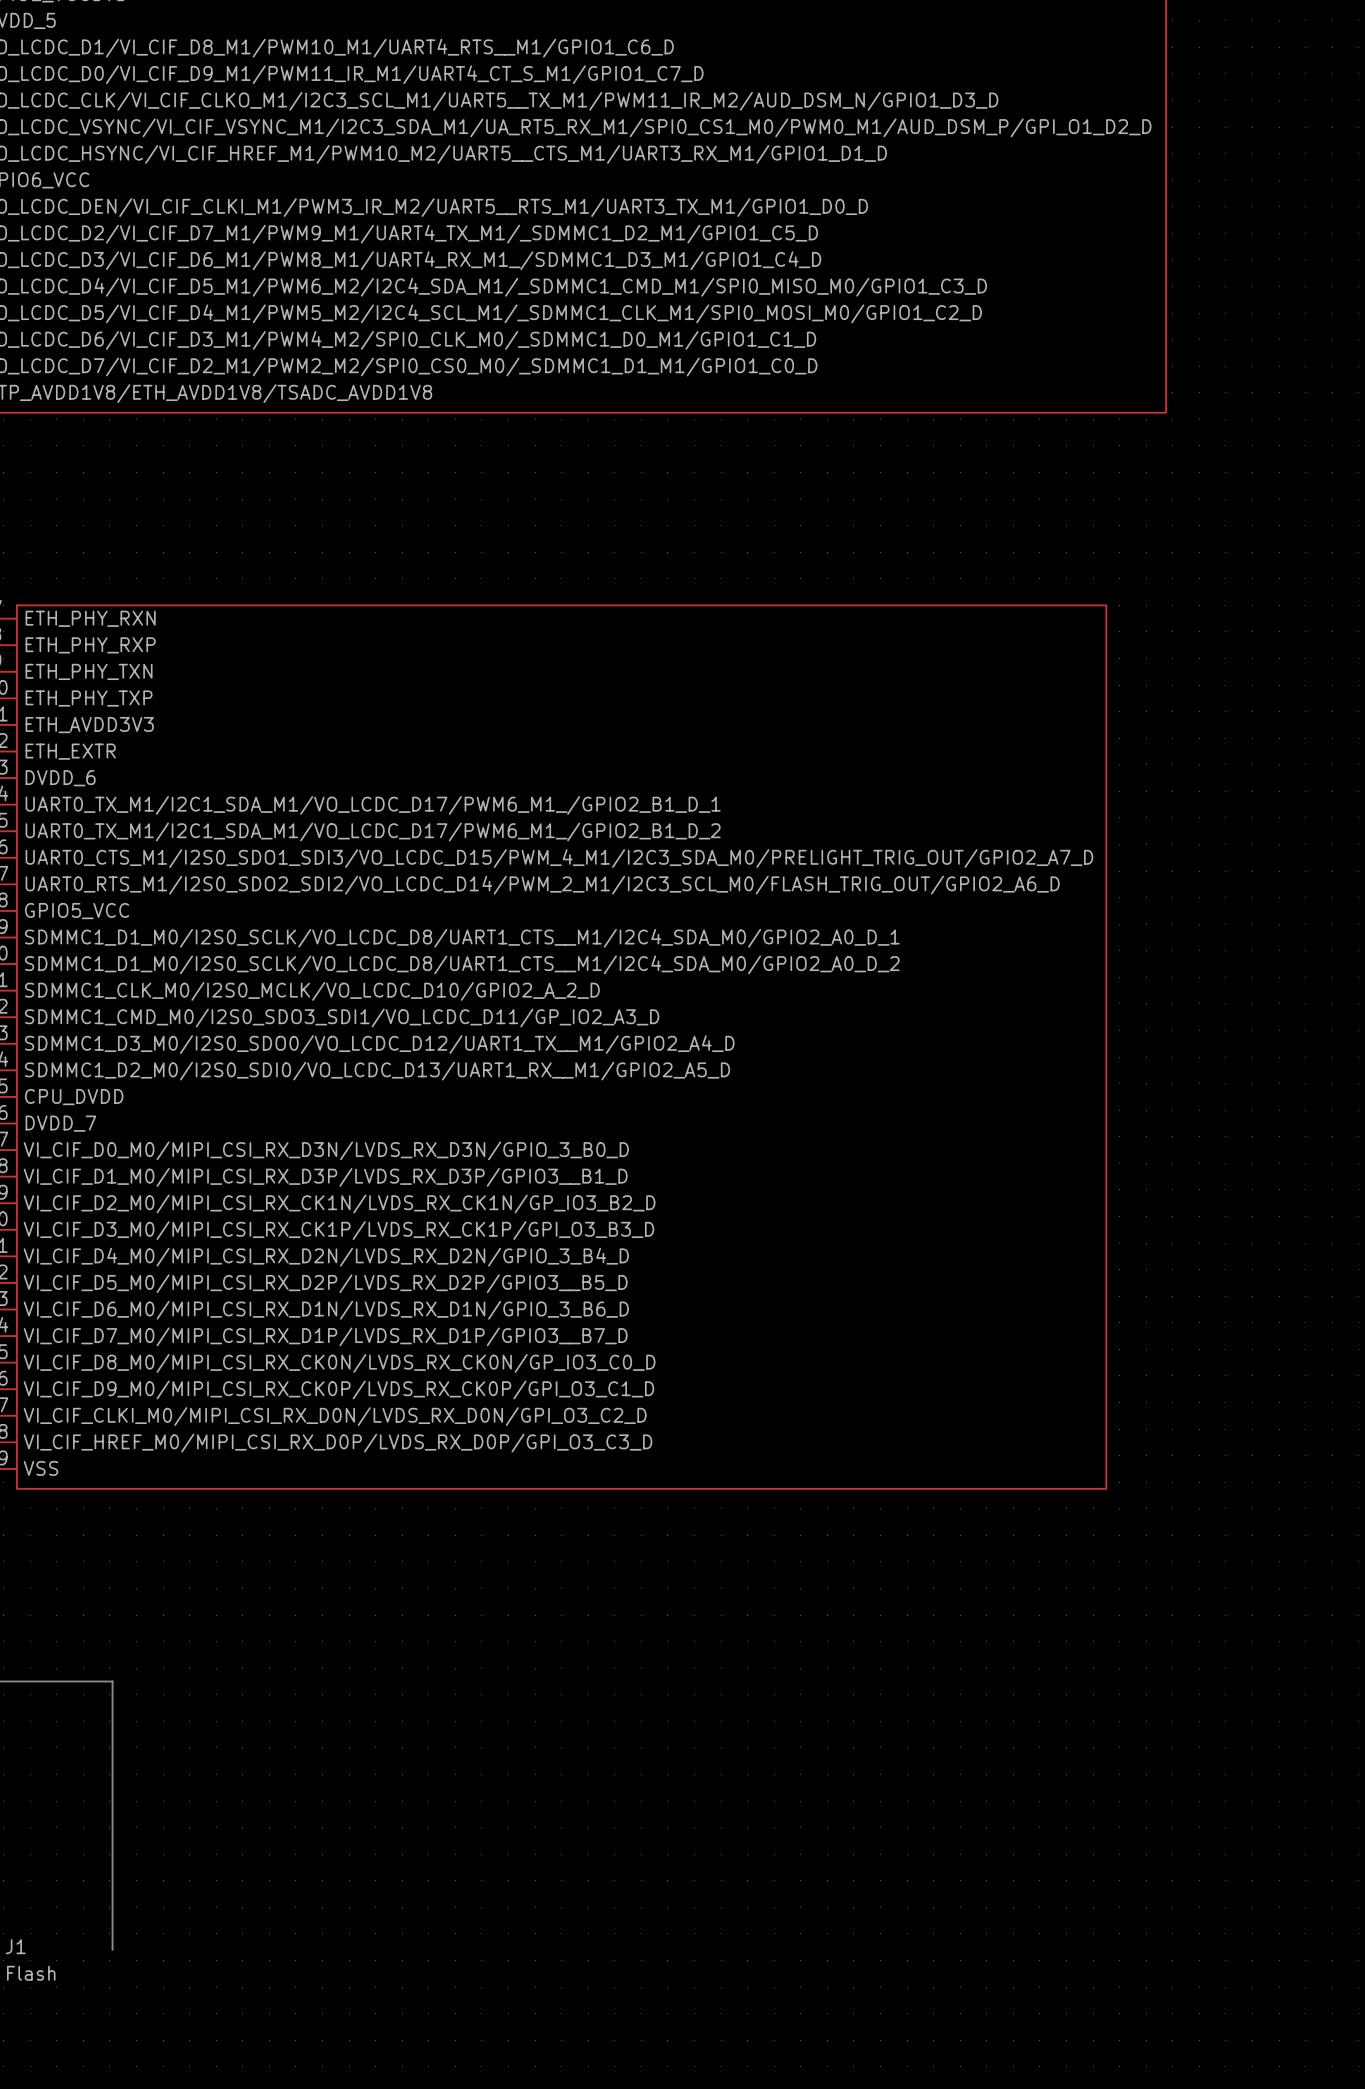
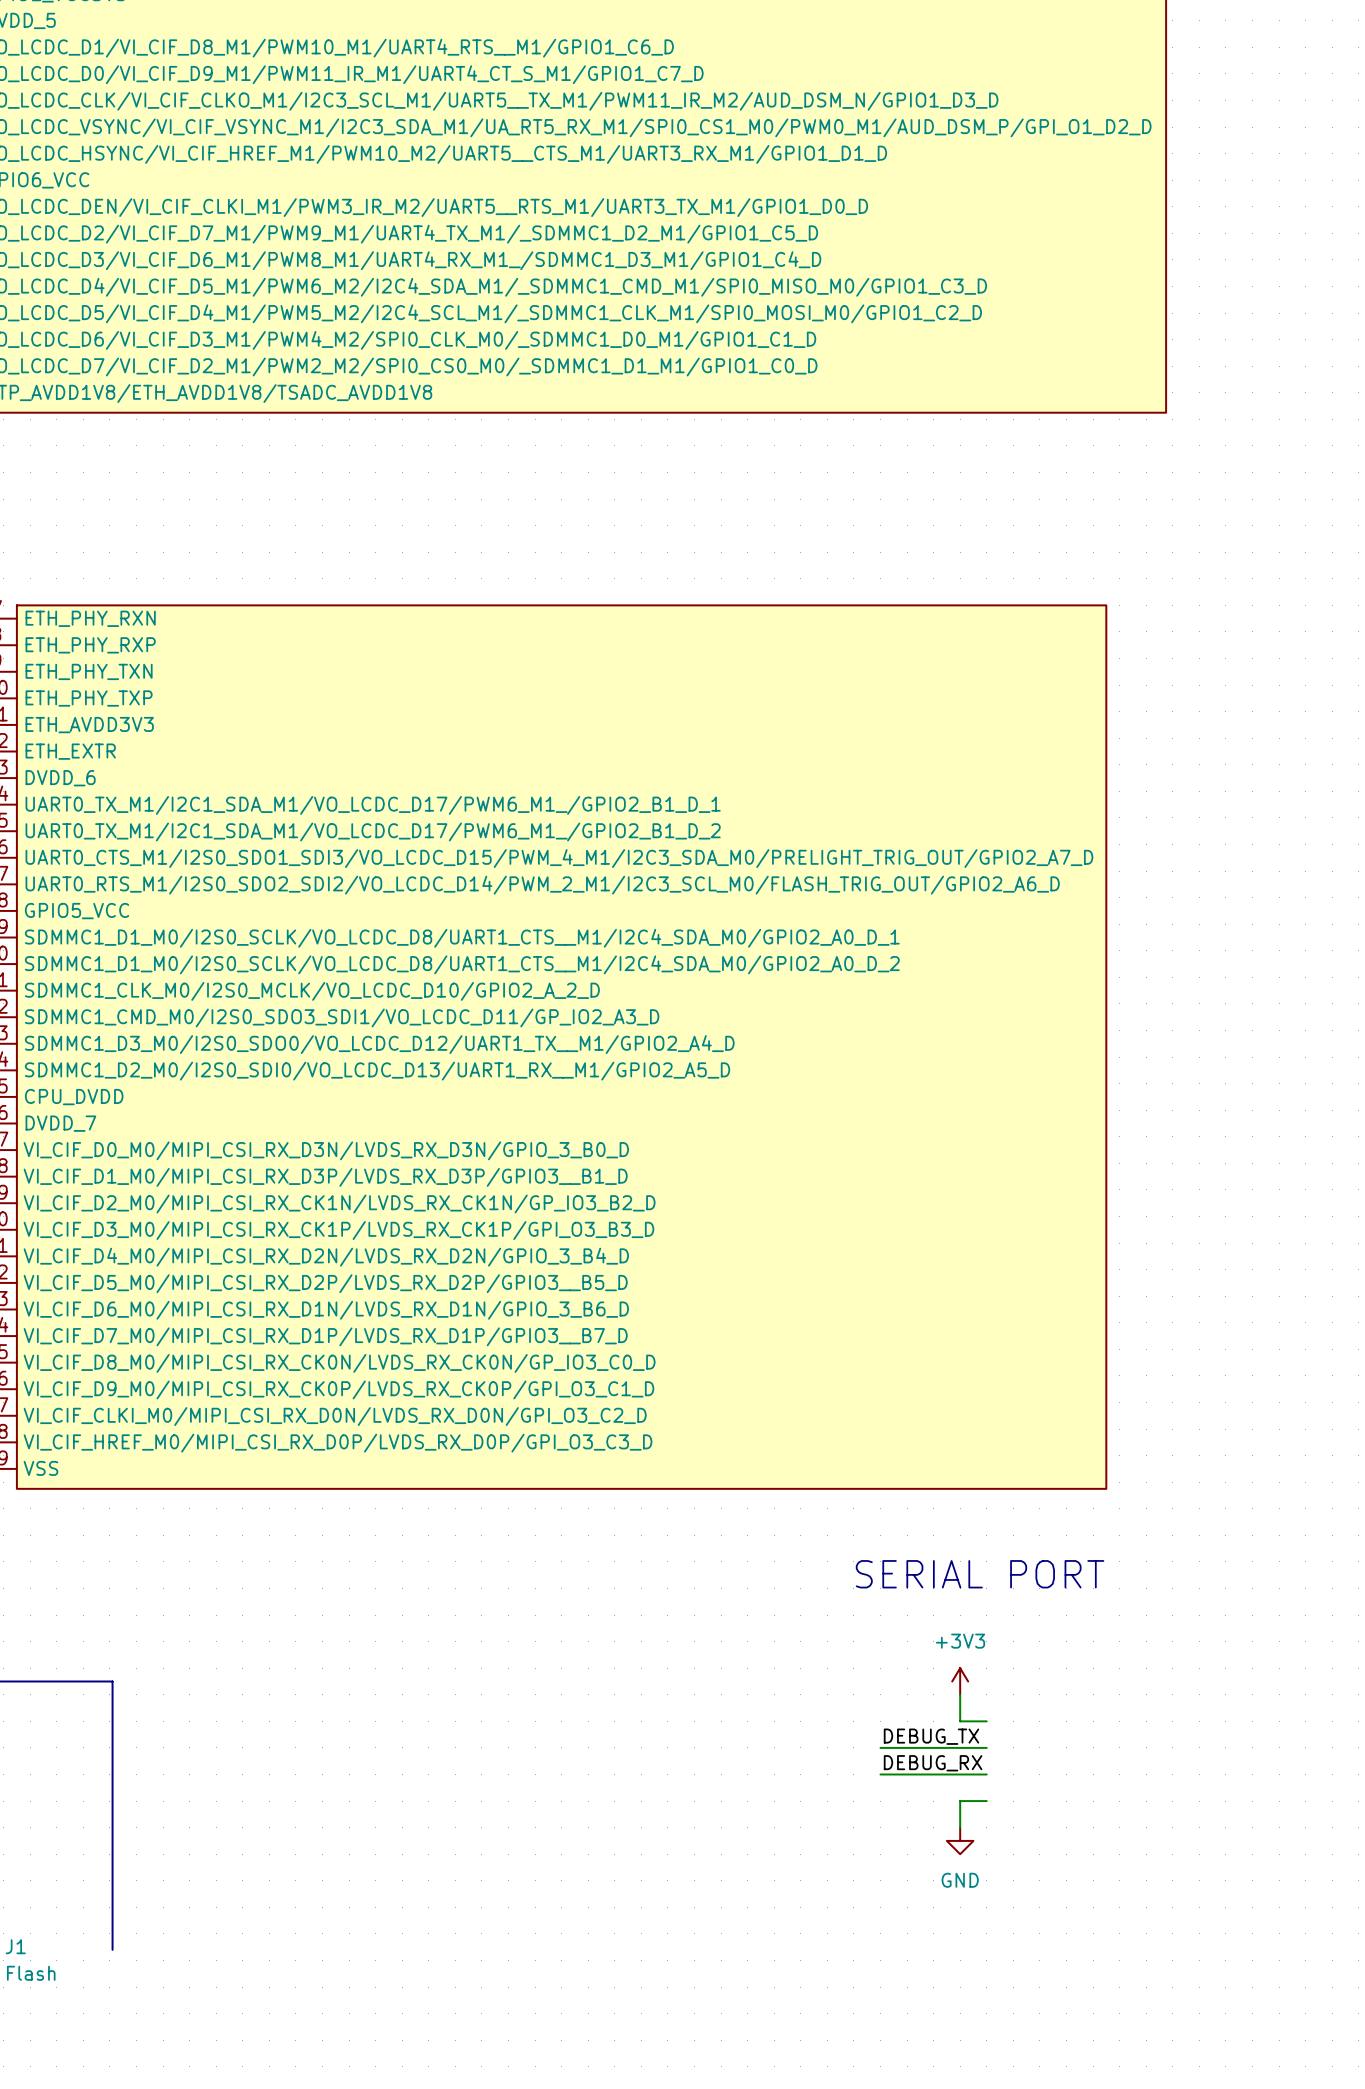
text: none -> SERIAL PORT (980, 1574)
power symbol: none -> +3V3 (960, 1681)
wire: none -> (960, 1694) (960, 1721) (986, 1721)
label: none -> DEBUG_TX (931, 1736)
wire: none -> (880, 1747) (986, 1747)
label: none -> DEBUG_RX (933, 1763)
wire: none -> (880, 1774) (986, 1774)
wire: none -> (986, 1801) (960, 1801) (960, 1827)
power symbol: none -> GND (960, 1840)

